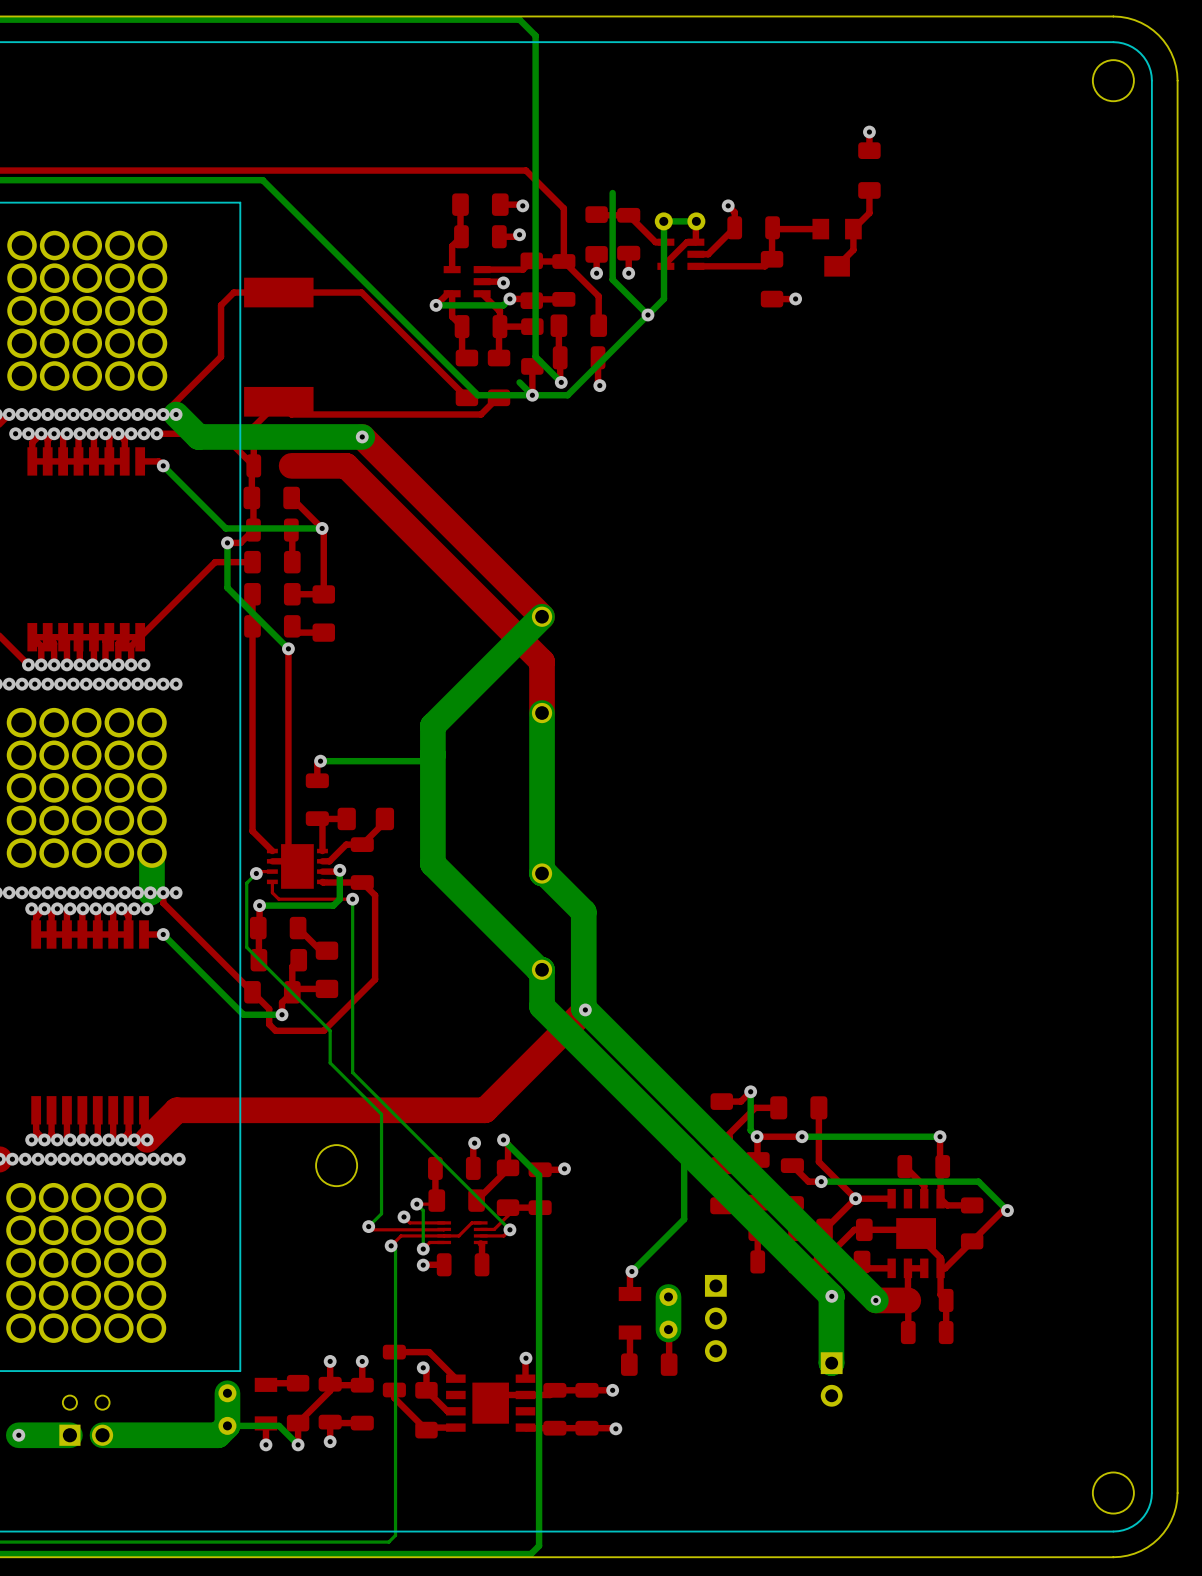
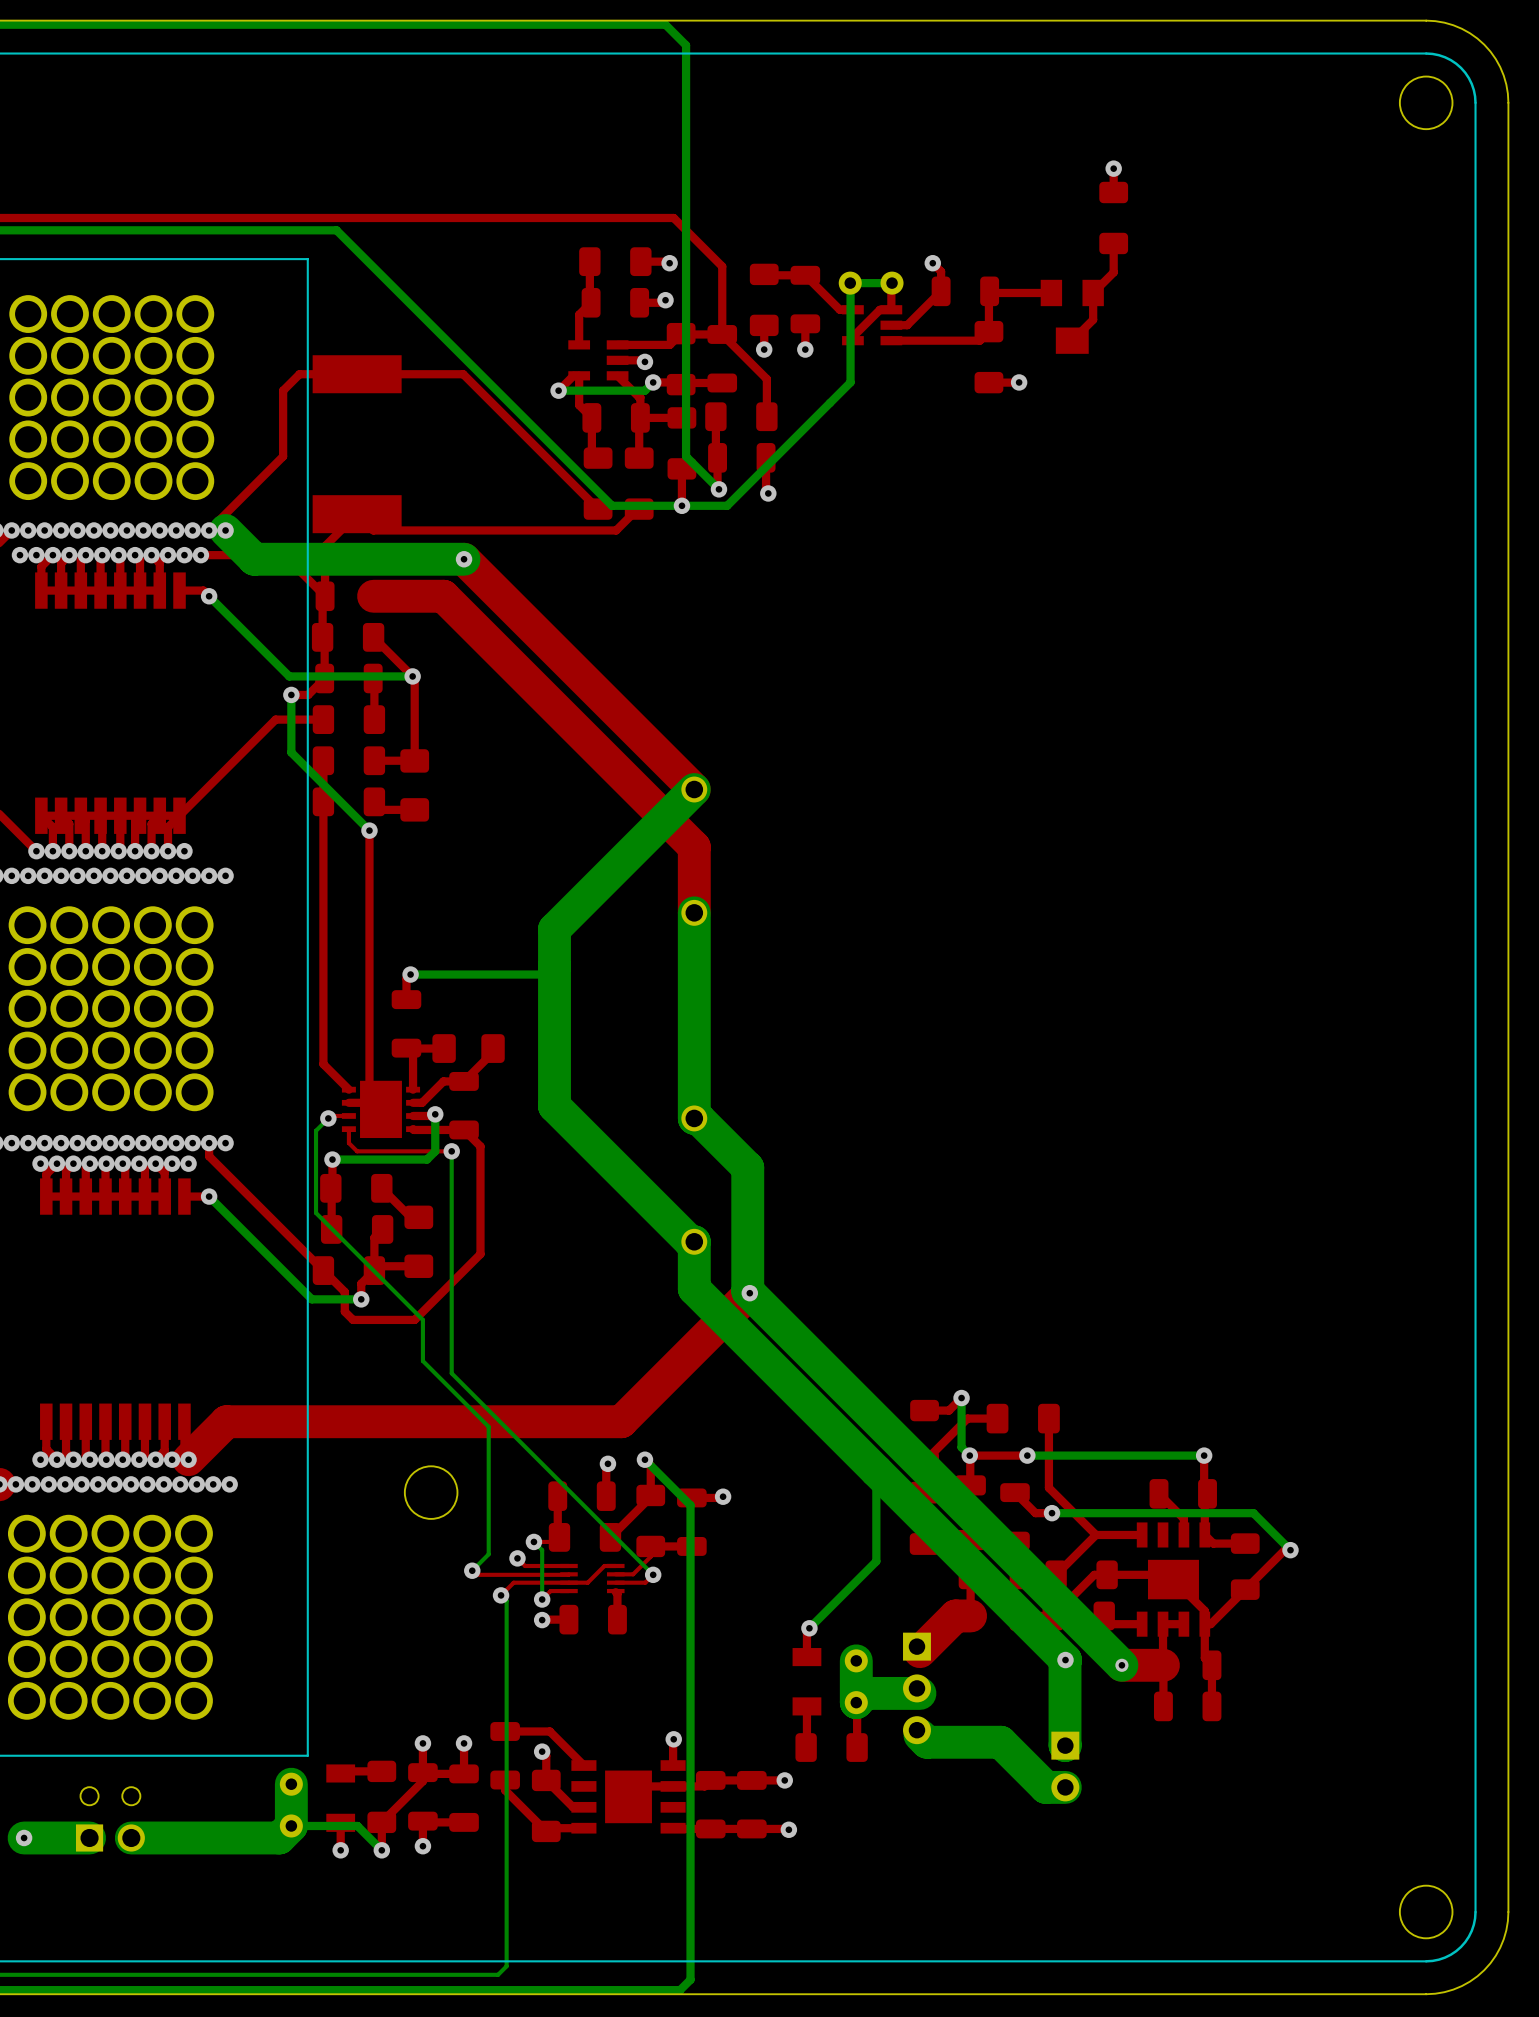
bottom track: (612, 193) (612, 279) (647, 315) -> none
via: (647, 315) -> none
bottom track: (519, 382) (532, 395) -> none
bottom track: (151, 853) (150, 892) -> none
via: (855, 1198) -> none
top track: none -> (970, 1615) (955, 1615) (919, 1651)
bottom track: none -> (919, 1693) (865, 1693) (856, 1702)
bottom track: none -> (919, 1735) (927, 1742) (1000, 1742) (1045, 1787) (1065, 1787)

